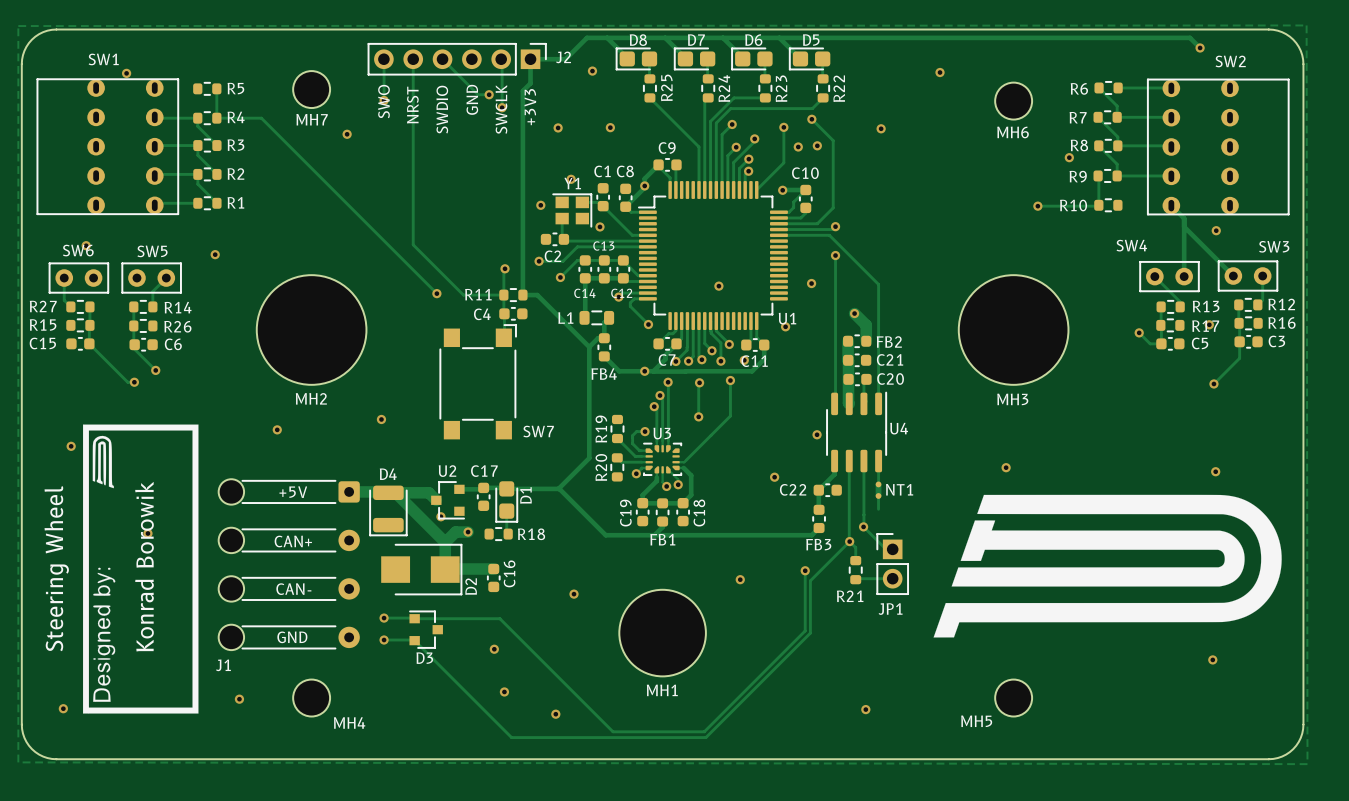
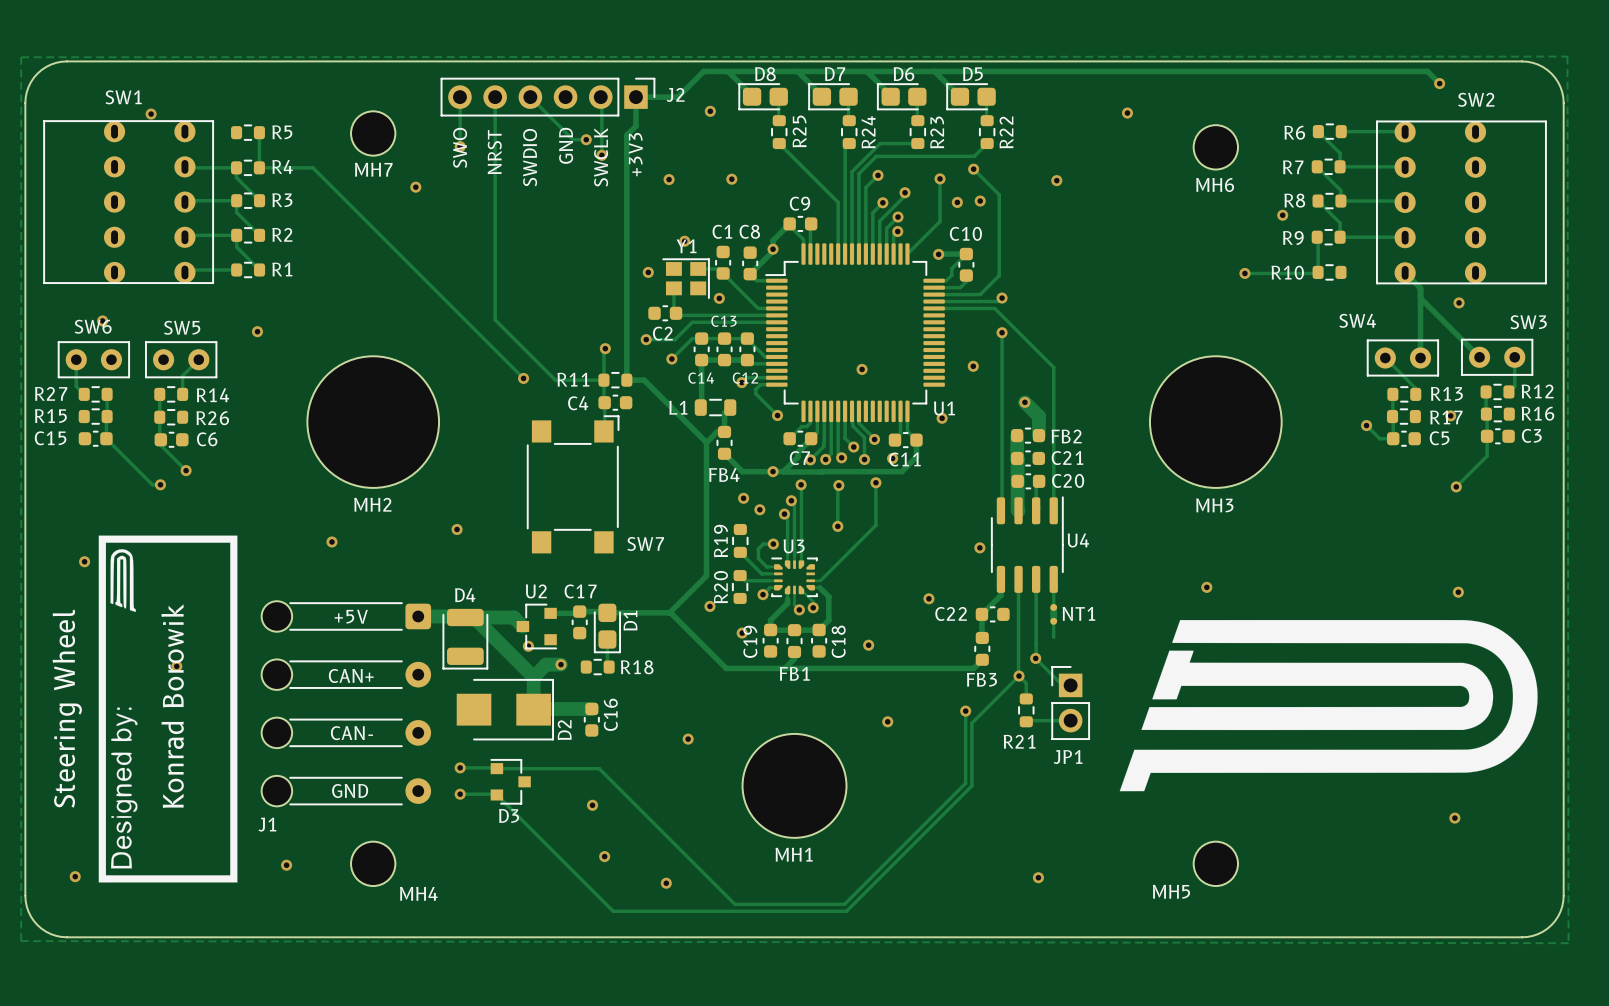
via: none -> (743, 498)
via: none -> (759, 509)
via: none -> (709, 606)
via: none -> (742, 633)
via: none -> (868, 645)

